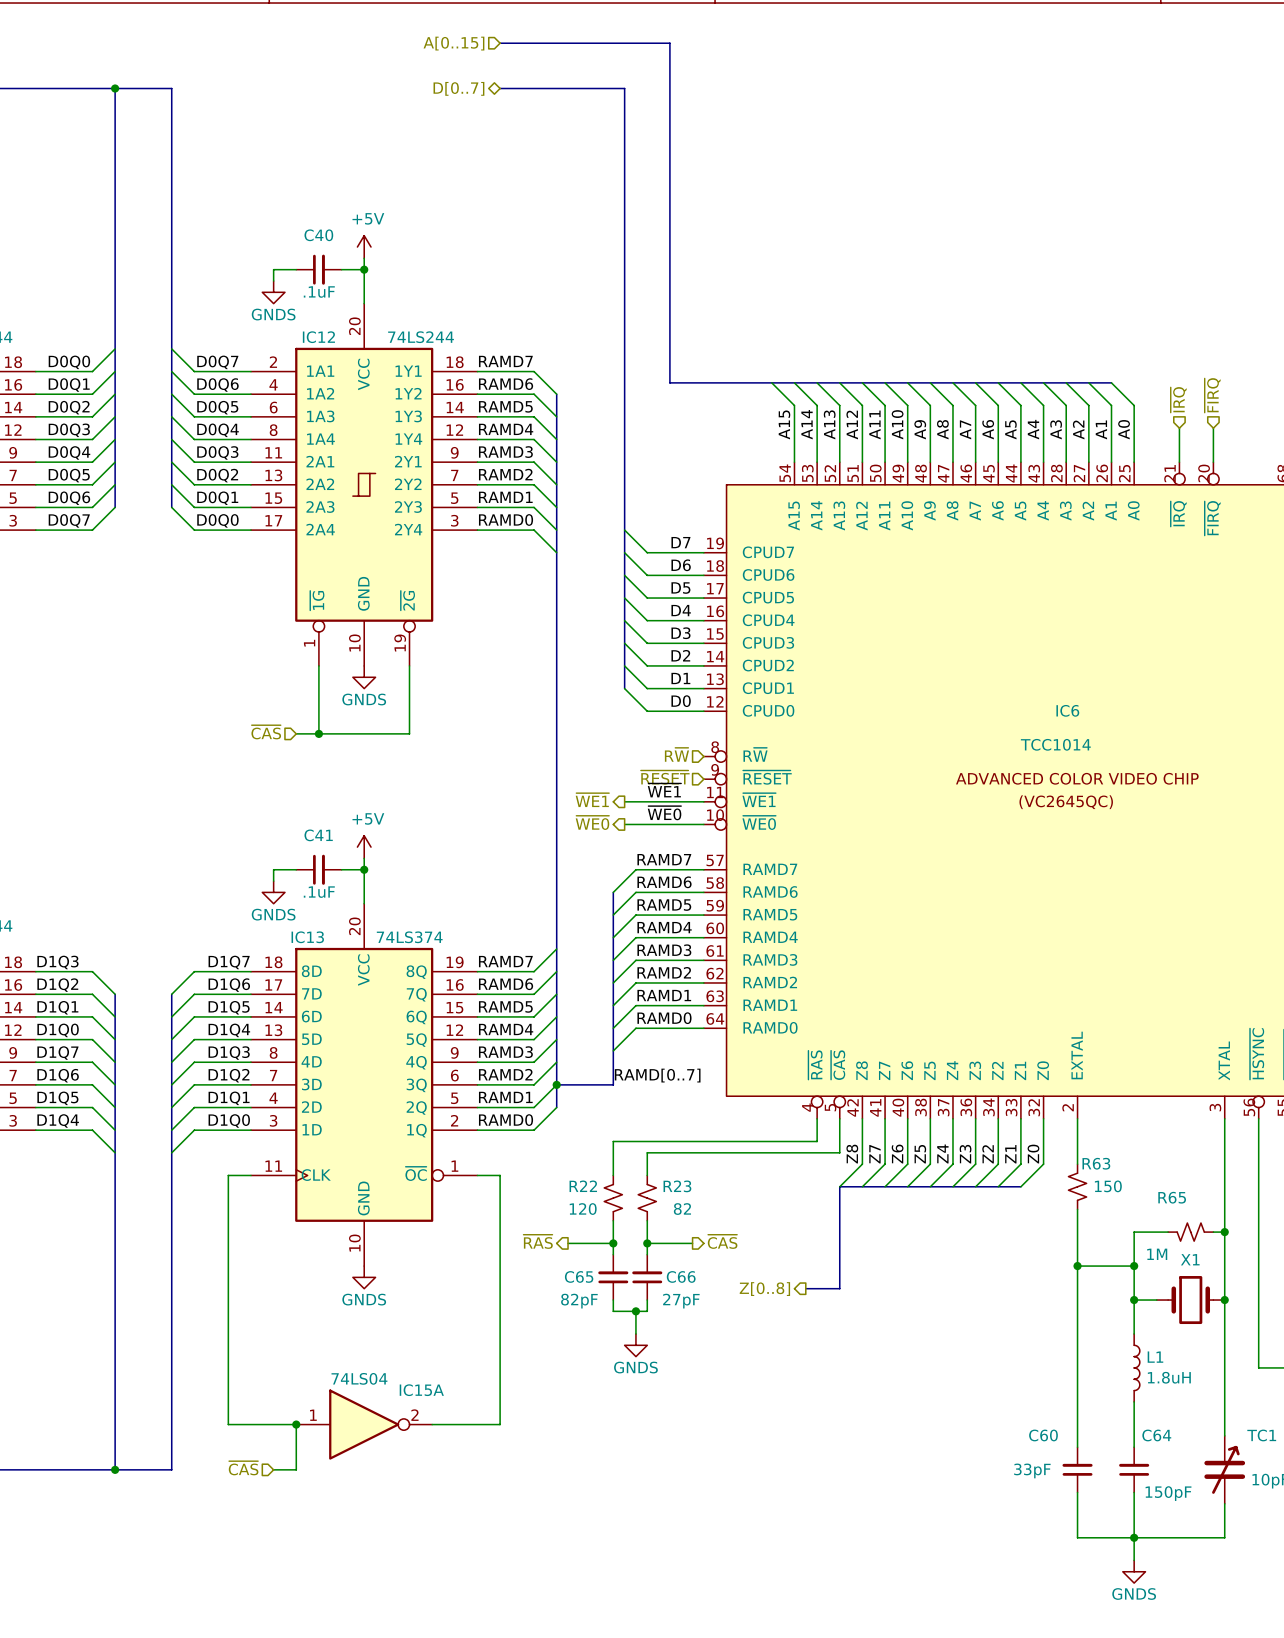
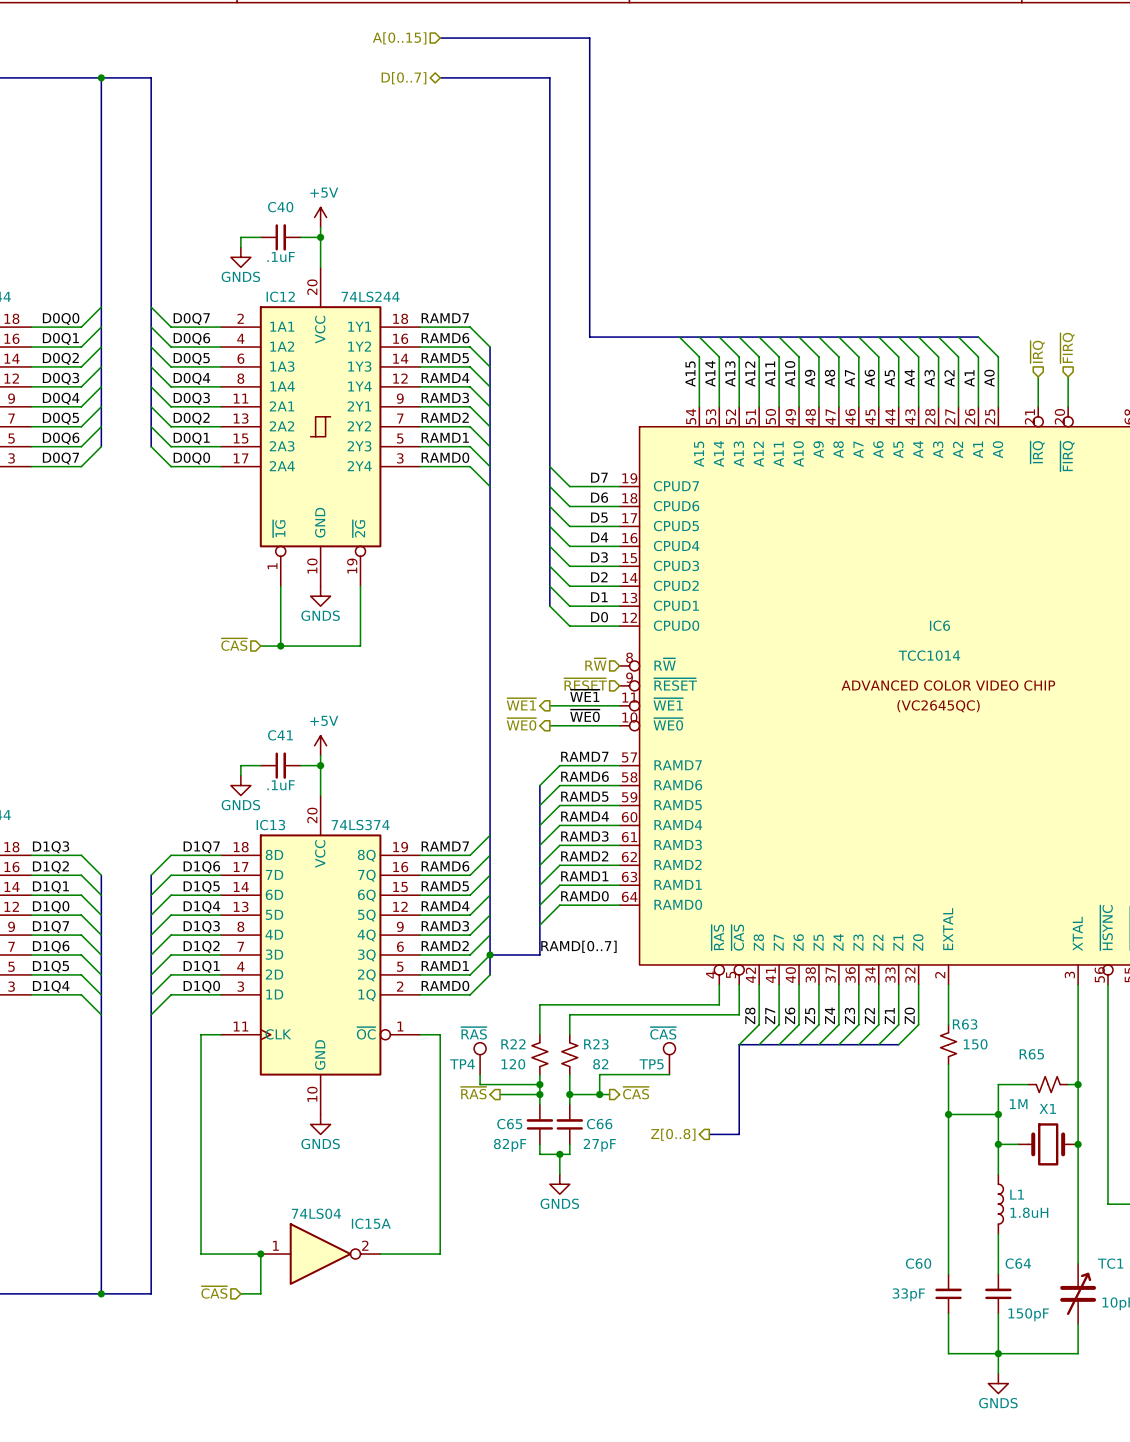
TP4: none -> ~{RAS} (480, 1058)
TP5: none -> ~{CAS} (669, 1058)
wire: none -> (480, 1074) (480, 1084) (539, 1084)
wire: none -> (669, 1074) (599, 1074) (599, 1094)
junction: none -> (539, 1084)
junction: none -> (599, 1094)

